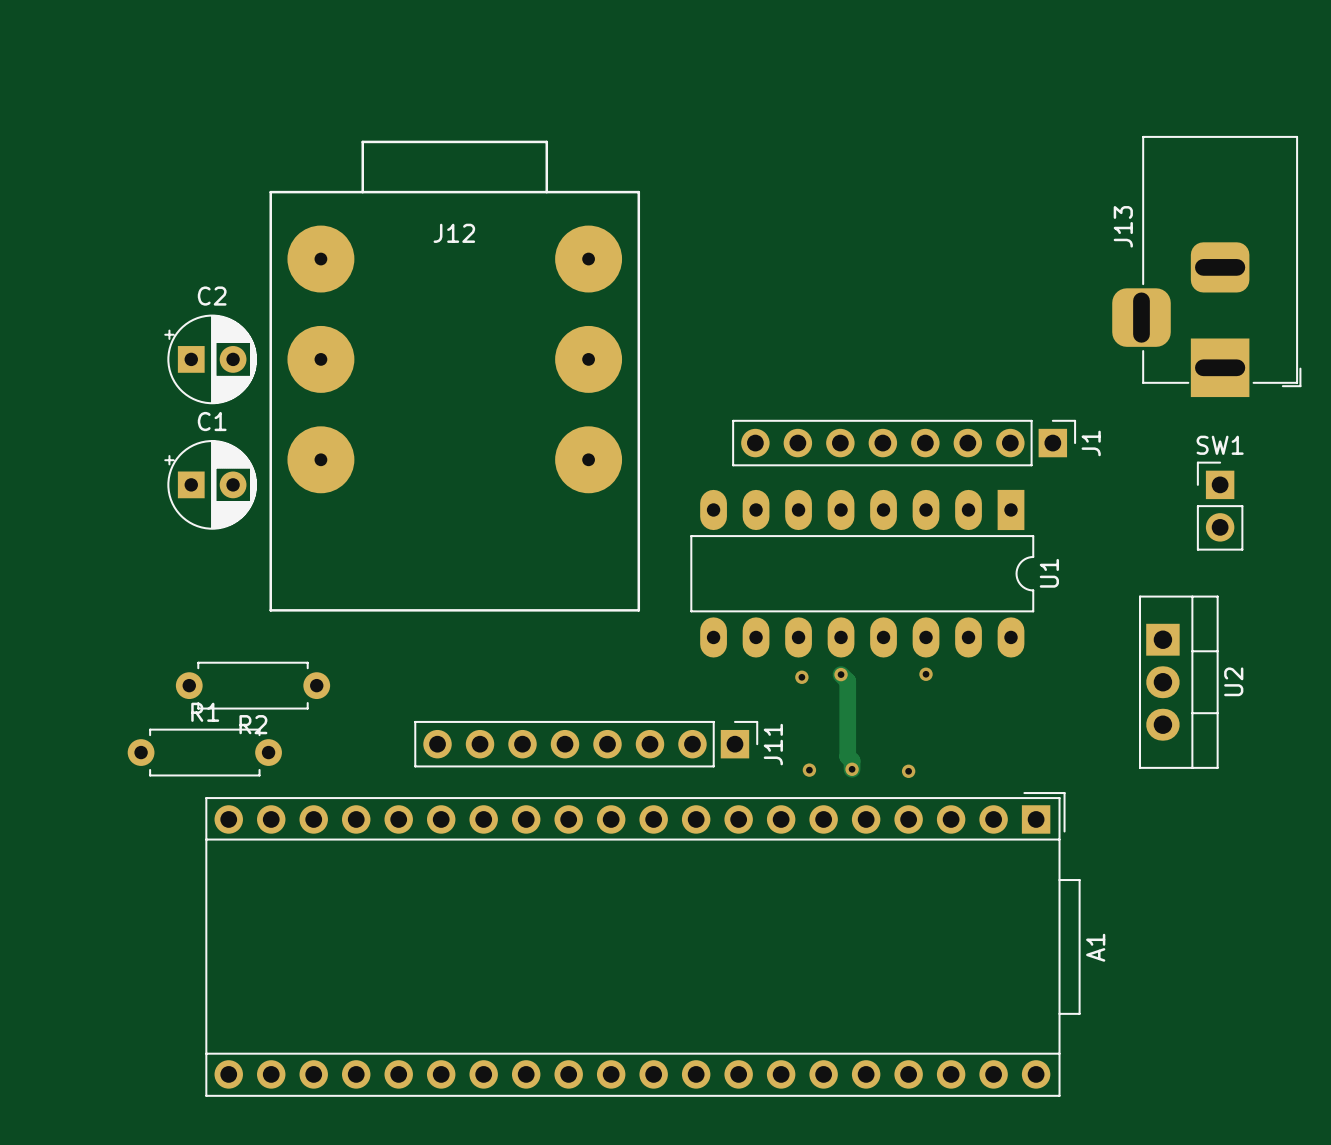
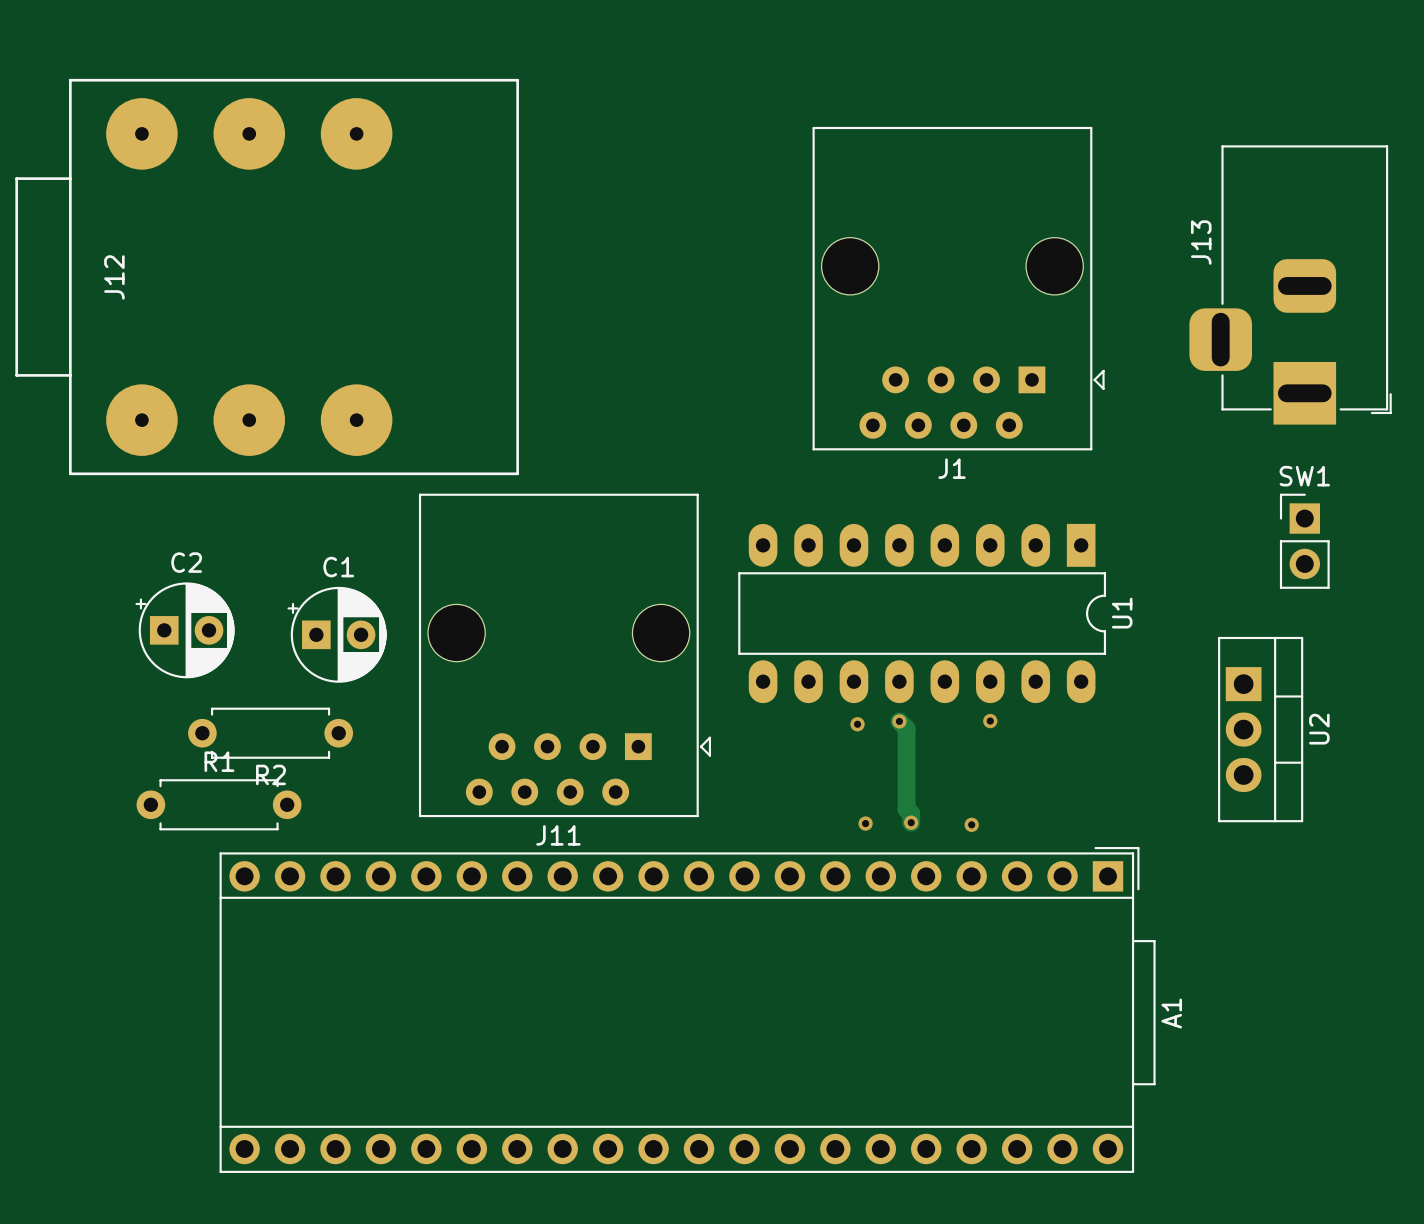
C2 position: (210, 359) -> (185, 630)
J12 rotation: 0° (454, 376) -> 90° counterclockwise (267, 277)
J1 footprint: [732, 419, 1077, 467] -> [812, 126, 1105, 451]
J1 name position: J1 (1091, 443) -> J1 (952, 468)
C1 position: (210, 484) -> (337, 634)
J11 footprint: [414, 720, 759, 768] -> [418, 493, 712, 818]
J11 name position: J11 (773, 744) -> J11 (558, 835)

